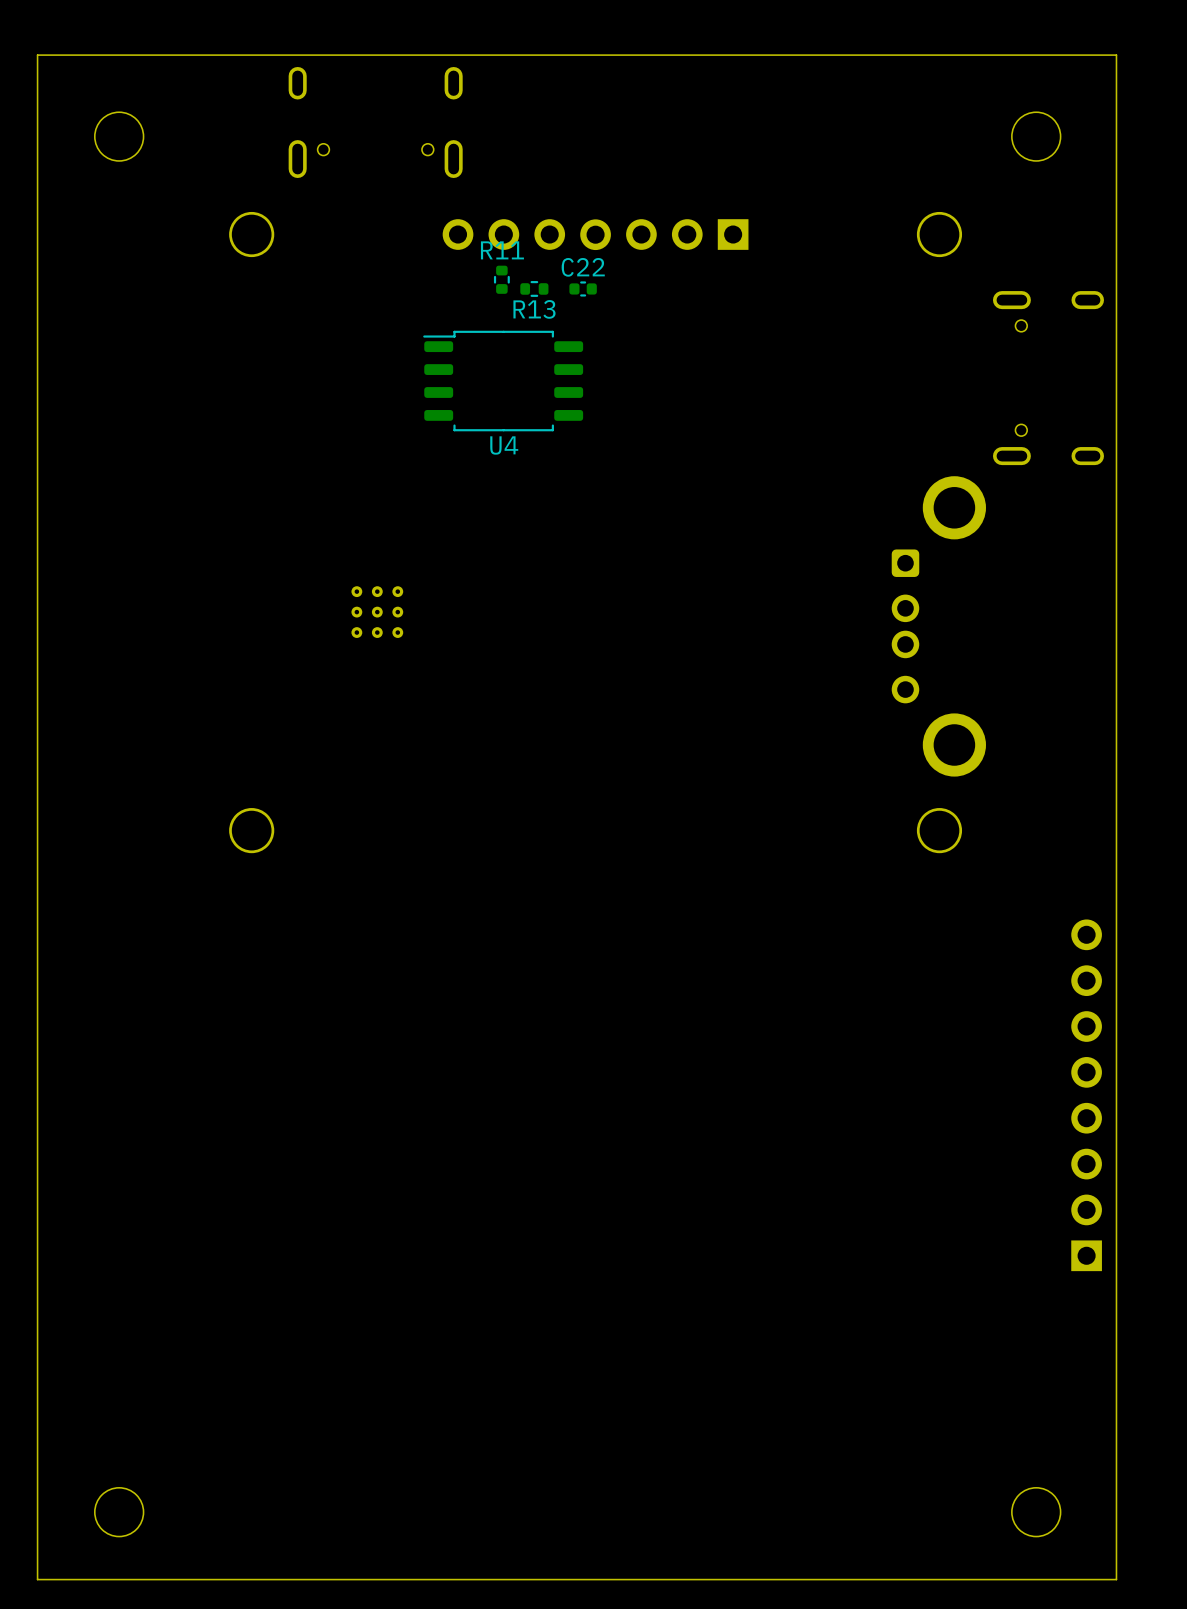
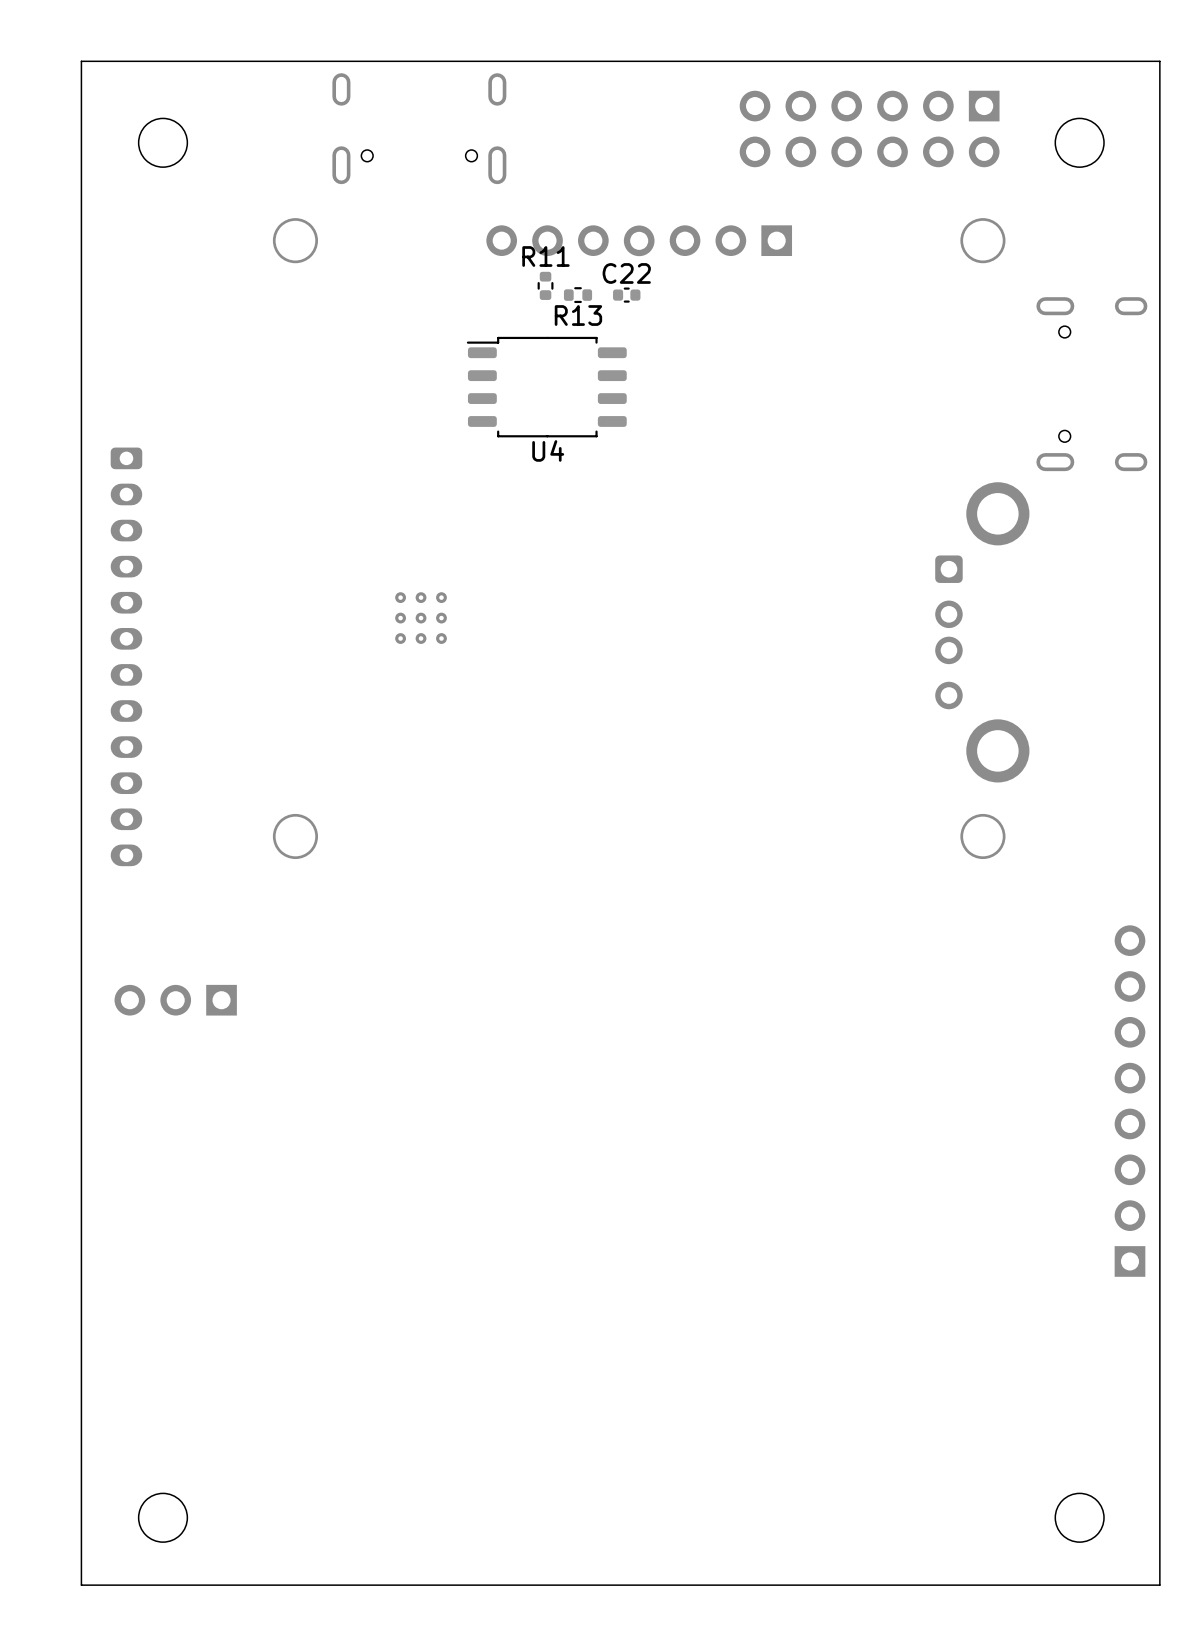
part: none -> (869, 128)
part: none -> (126, 656)
part: none -> (175, 1000)

